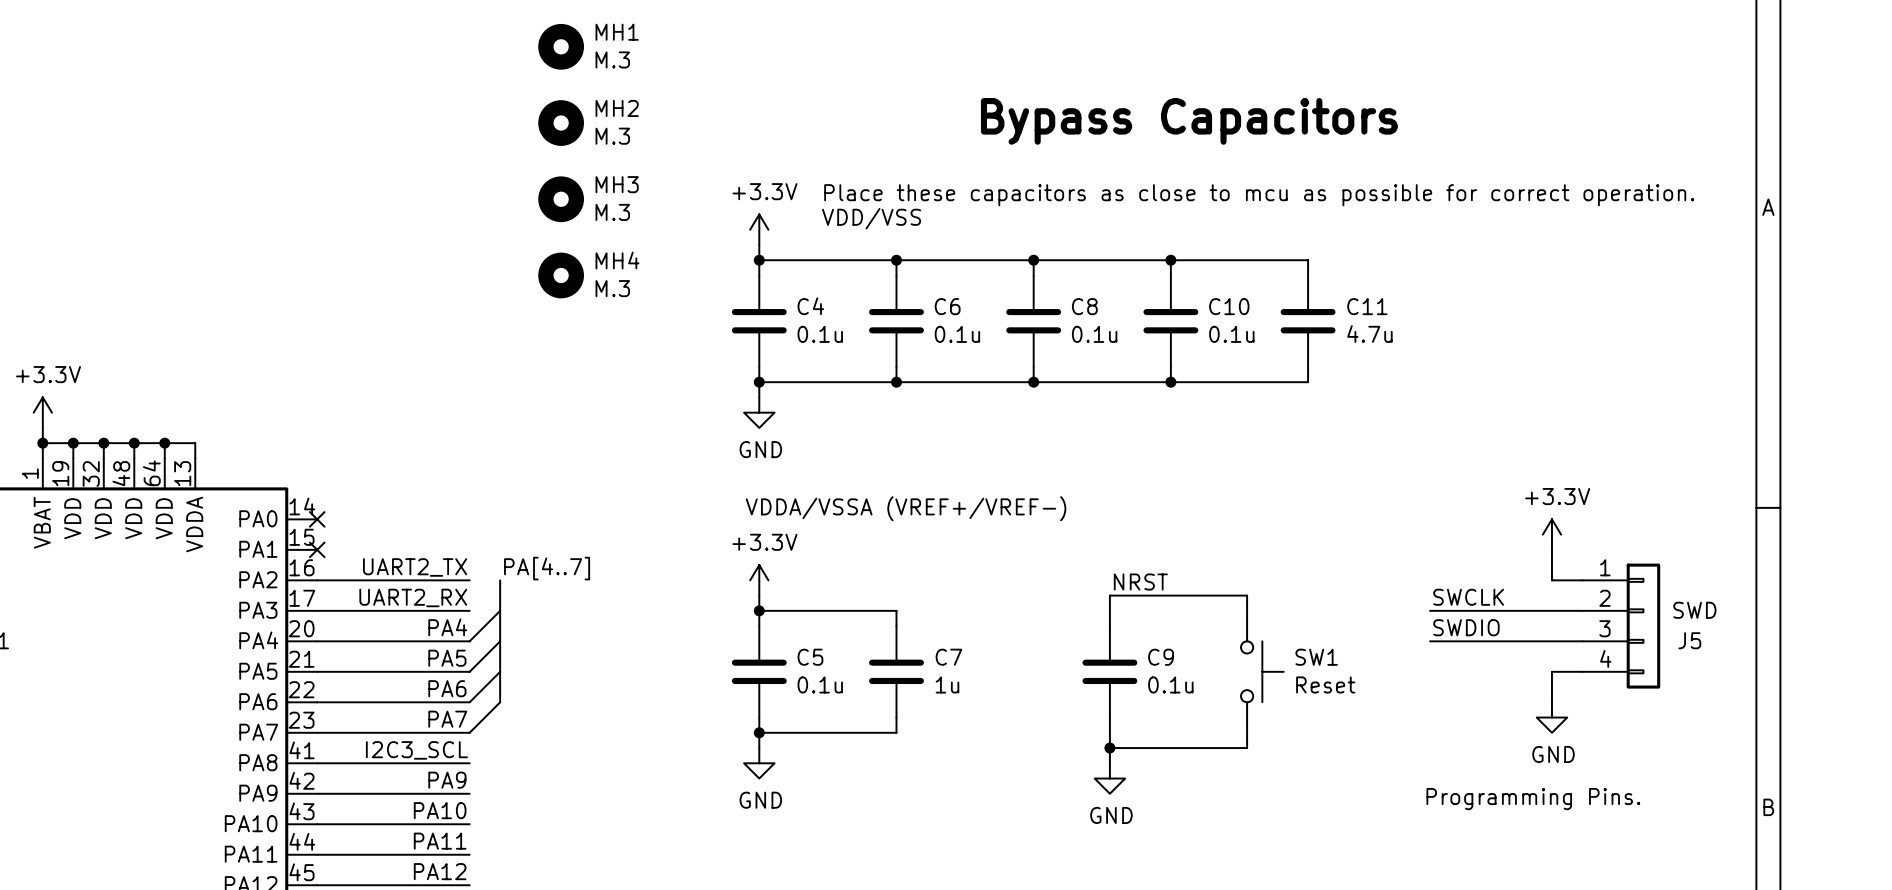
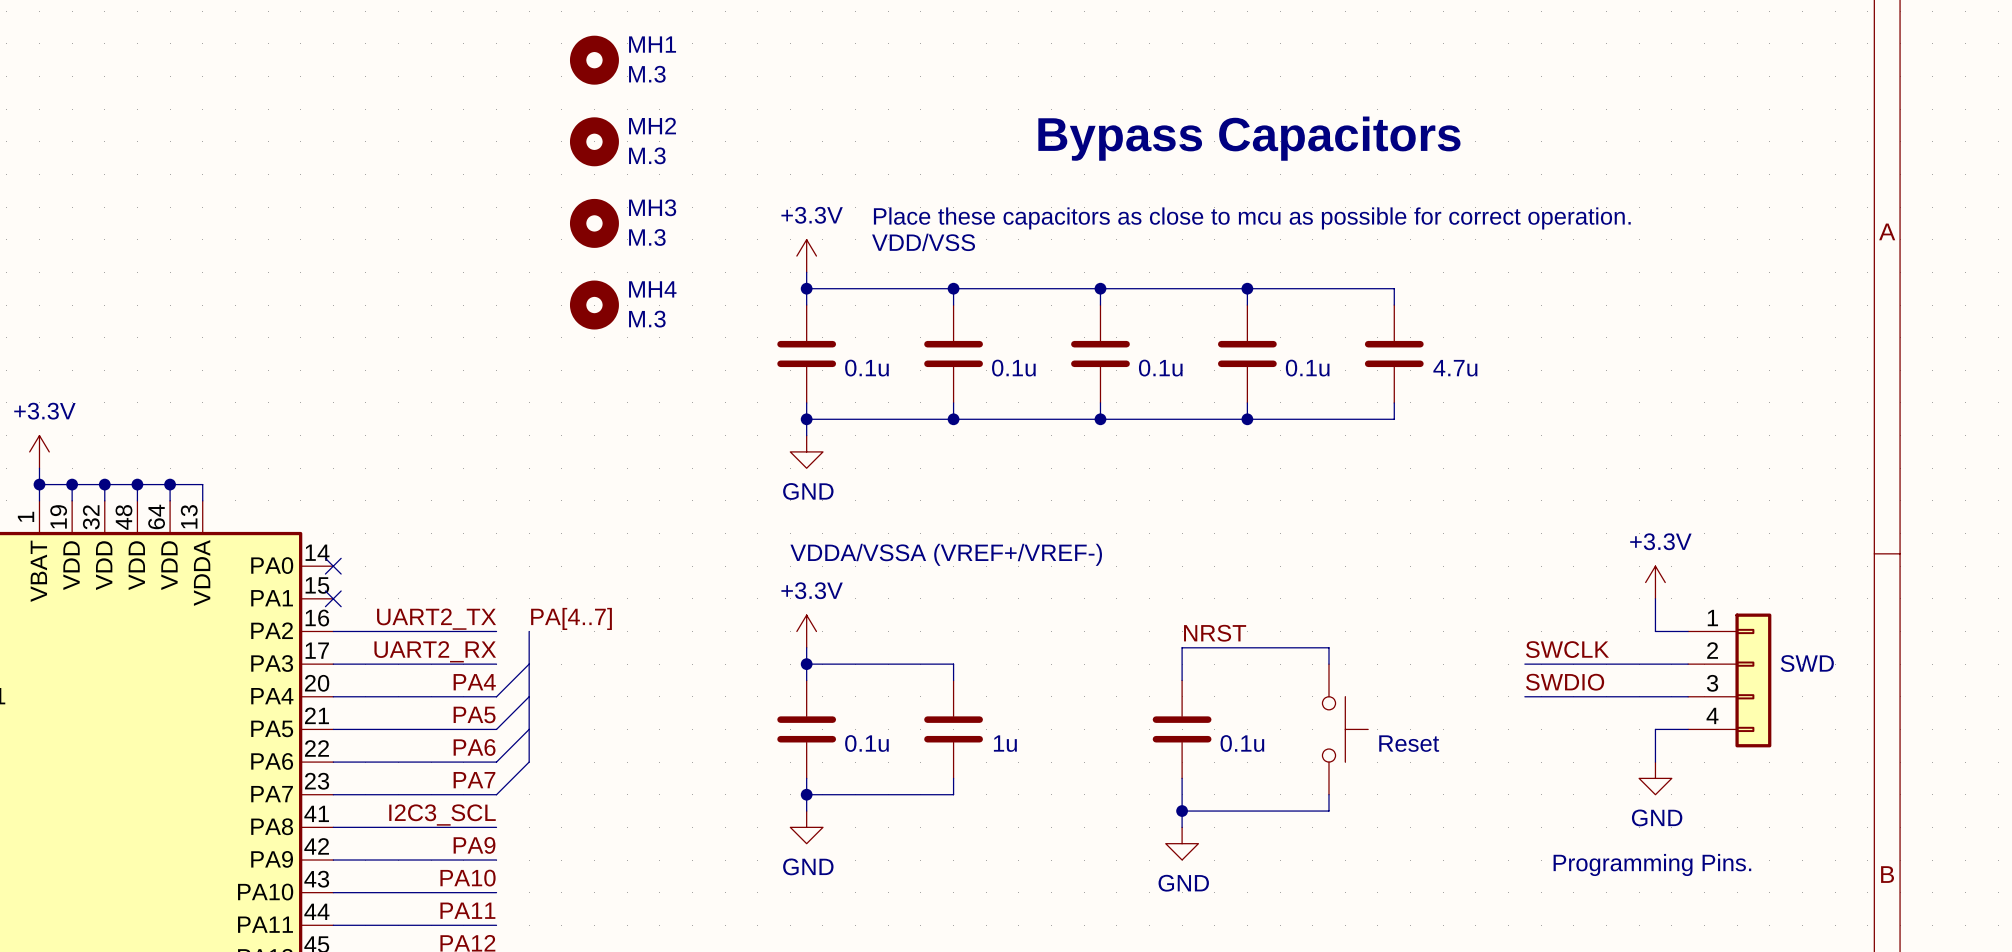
C4 name: C4 (810, 306) -> none
C6 name: C6 (947, 306) -> none
C8 name: C8 (1084, 306) -> none
C10 name: C10 (1229, 306) -> none
C11 name: C11 (1367, 306) -> none
J5 name: J5 (1689, 640) -> none
C5 name: C5 (810, 657) -> none
C7 name: C7 (948, 657) -> none
C9 name: C9 (1161, 657) -> none
SW1 name: SW1 (1316, 657) -> none

